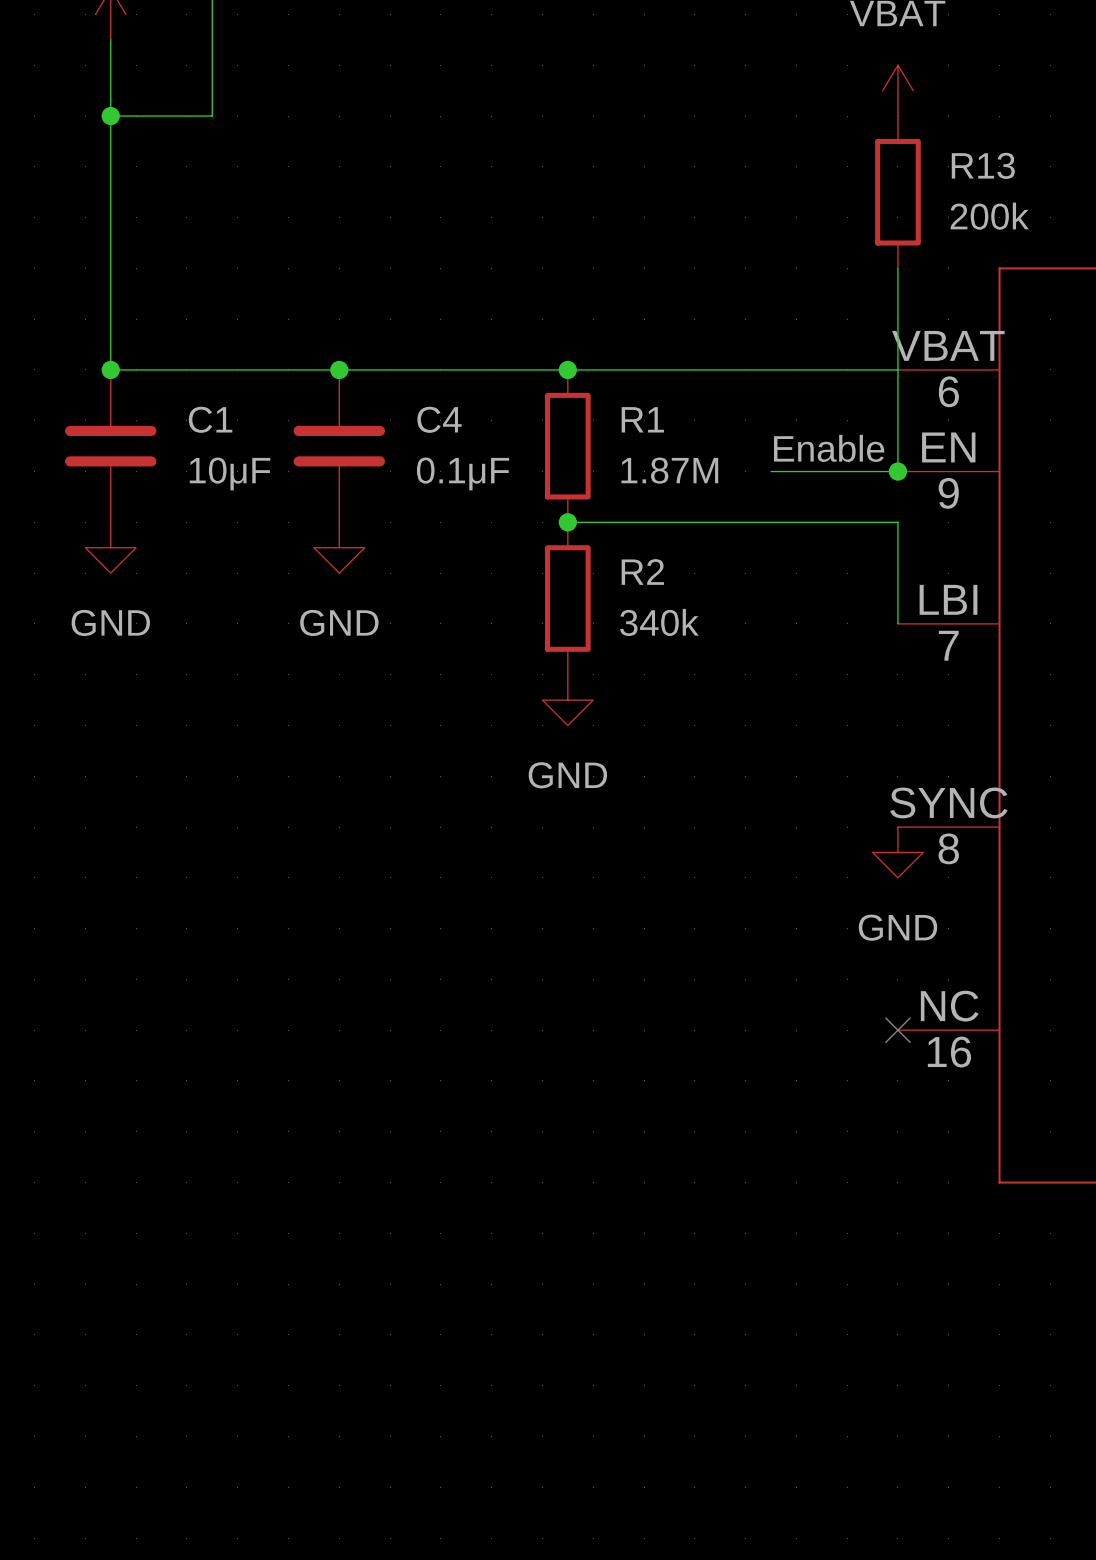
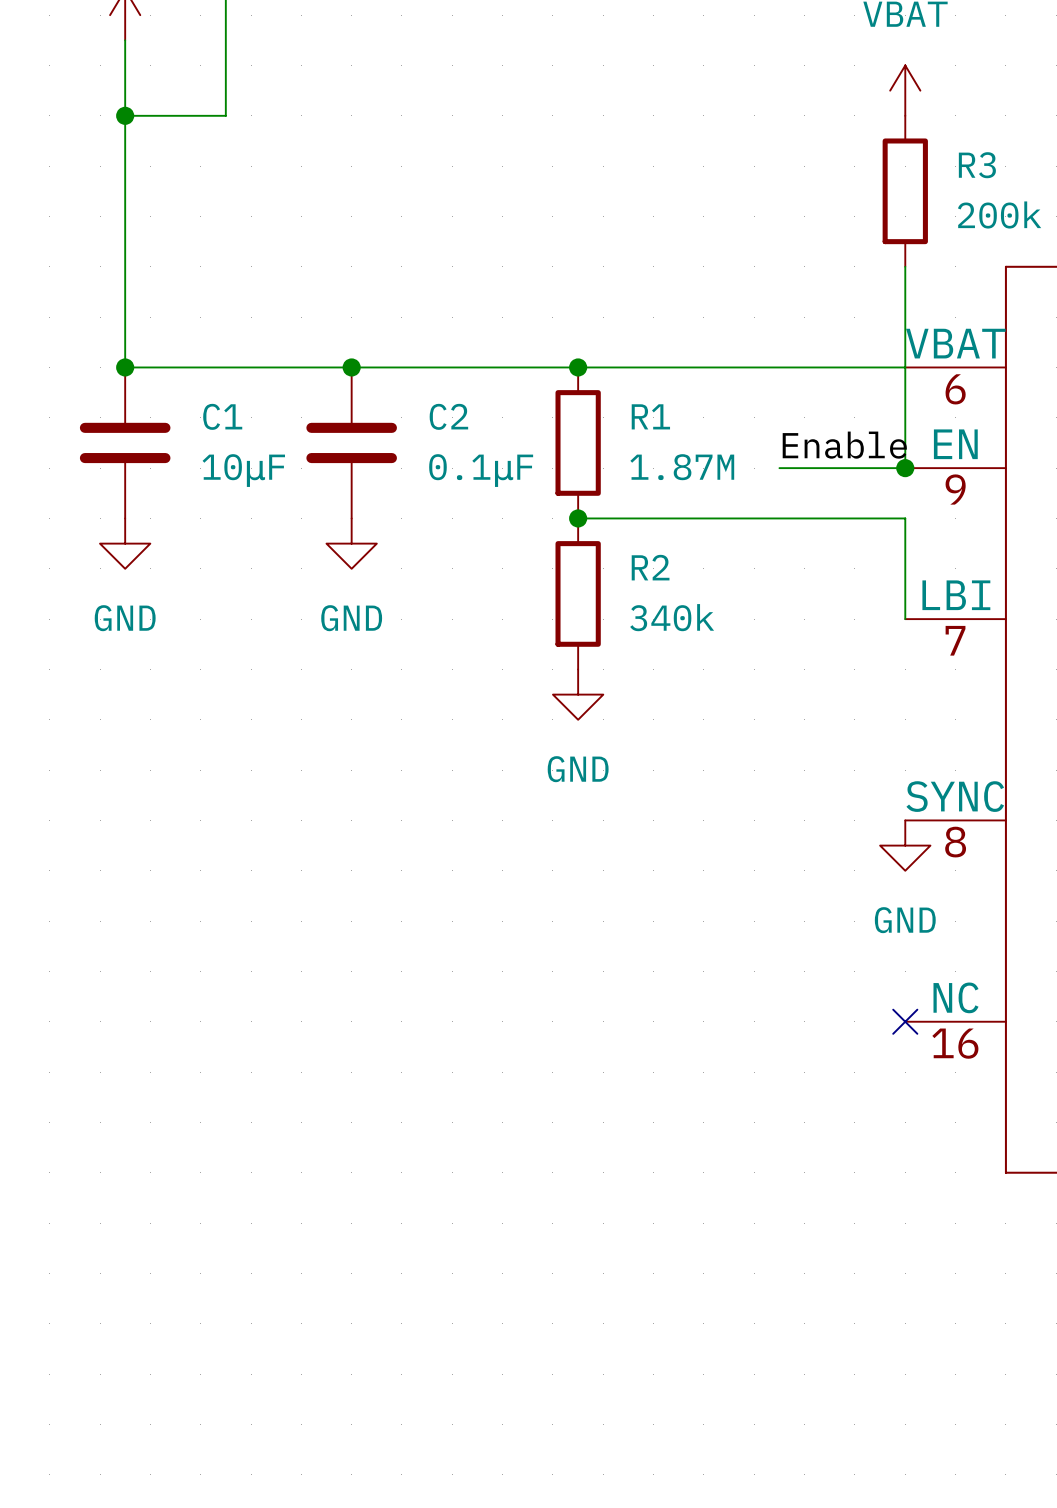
R13 name: R13 (983, 165) -> R3 (977, 165)
C4 name: C4 (439, 419) -> C2 (448, 416)

